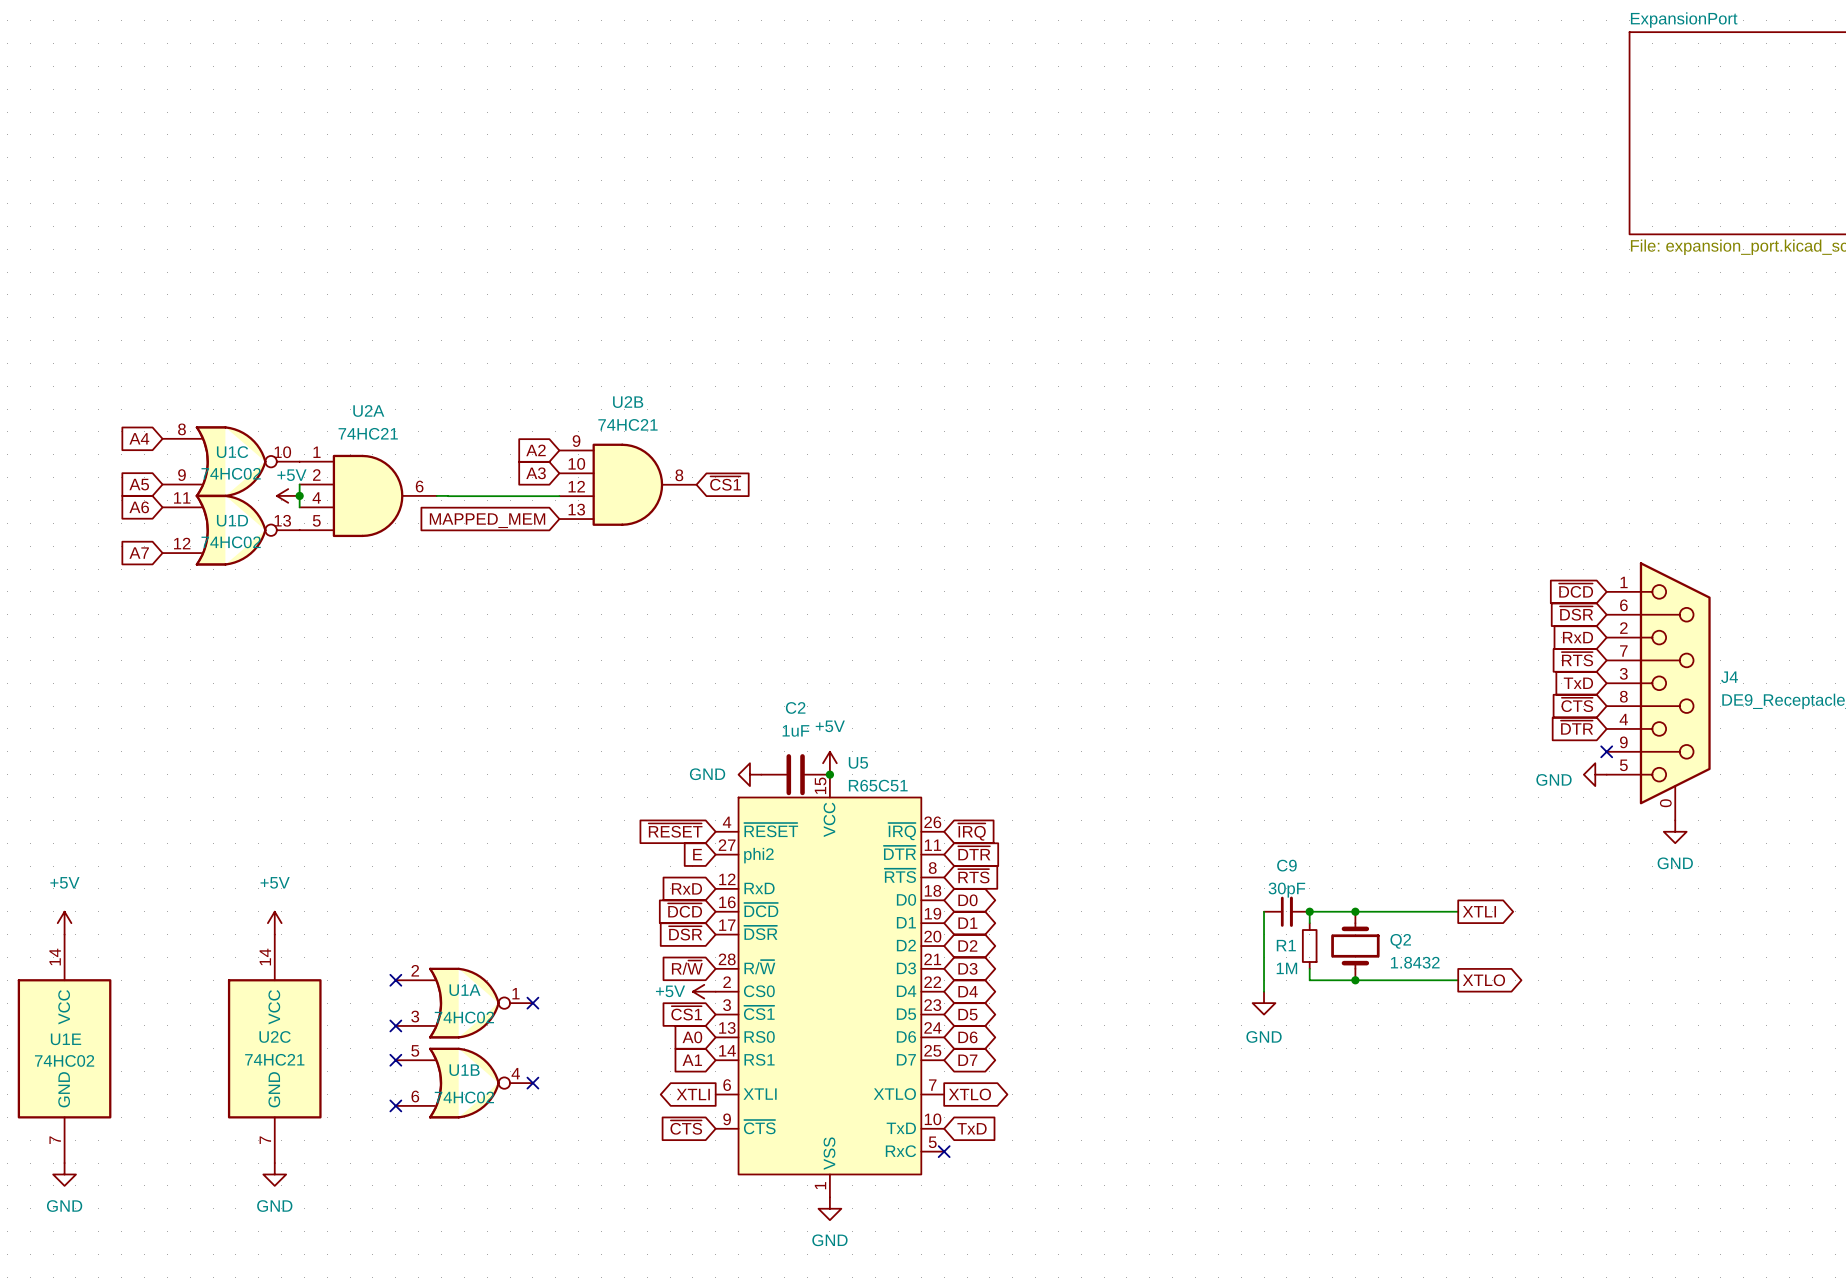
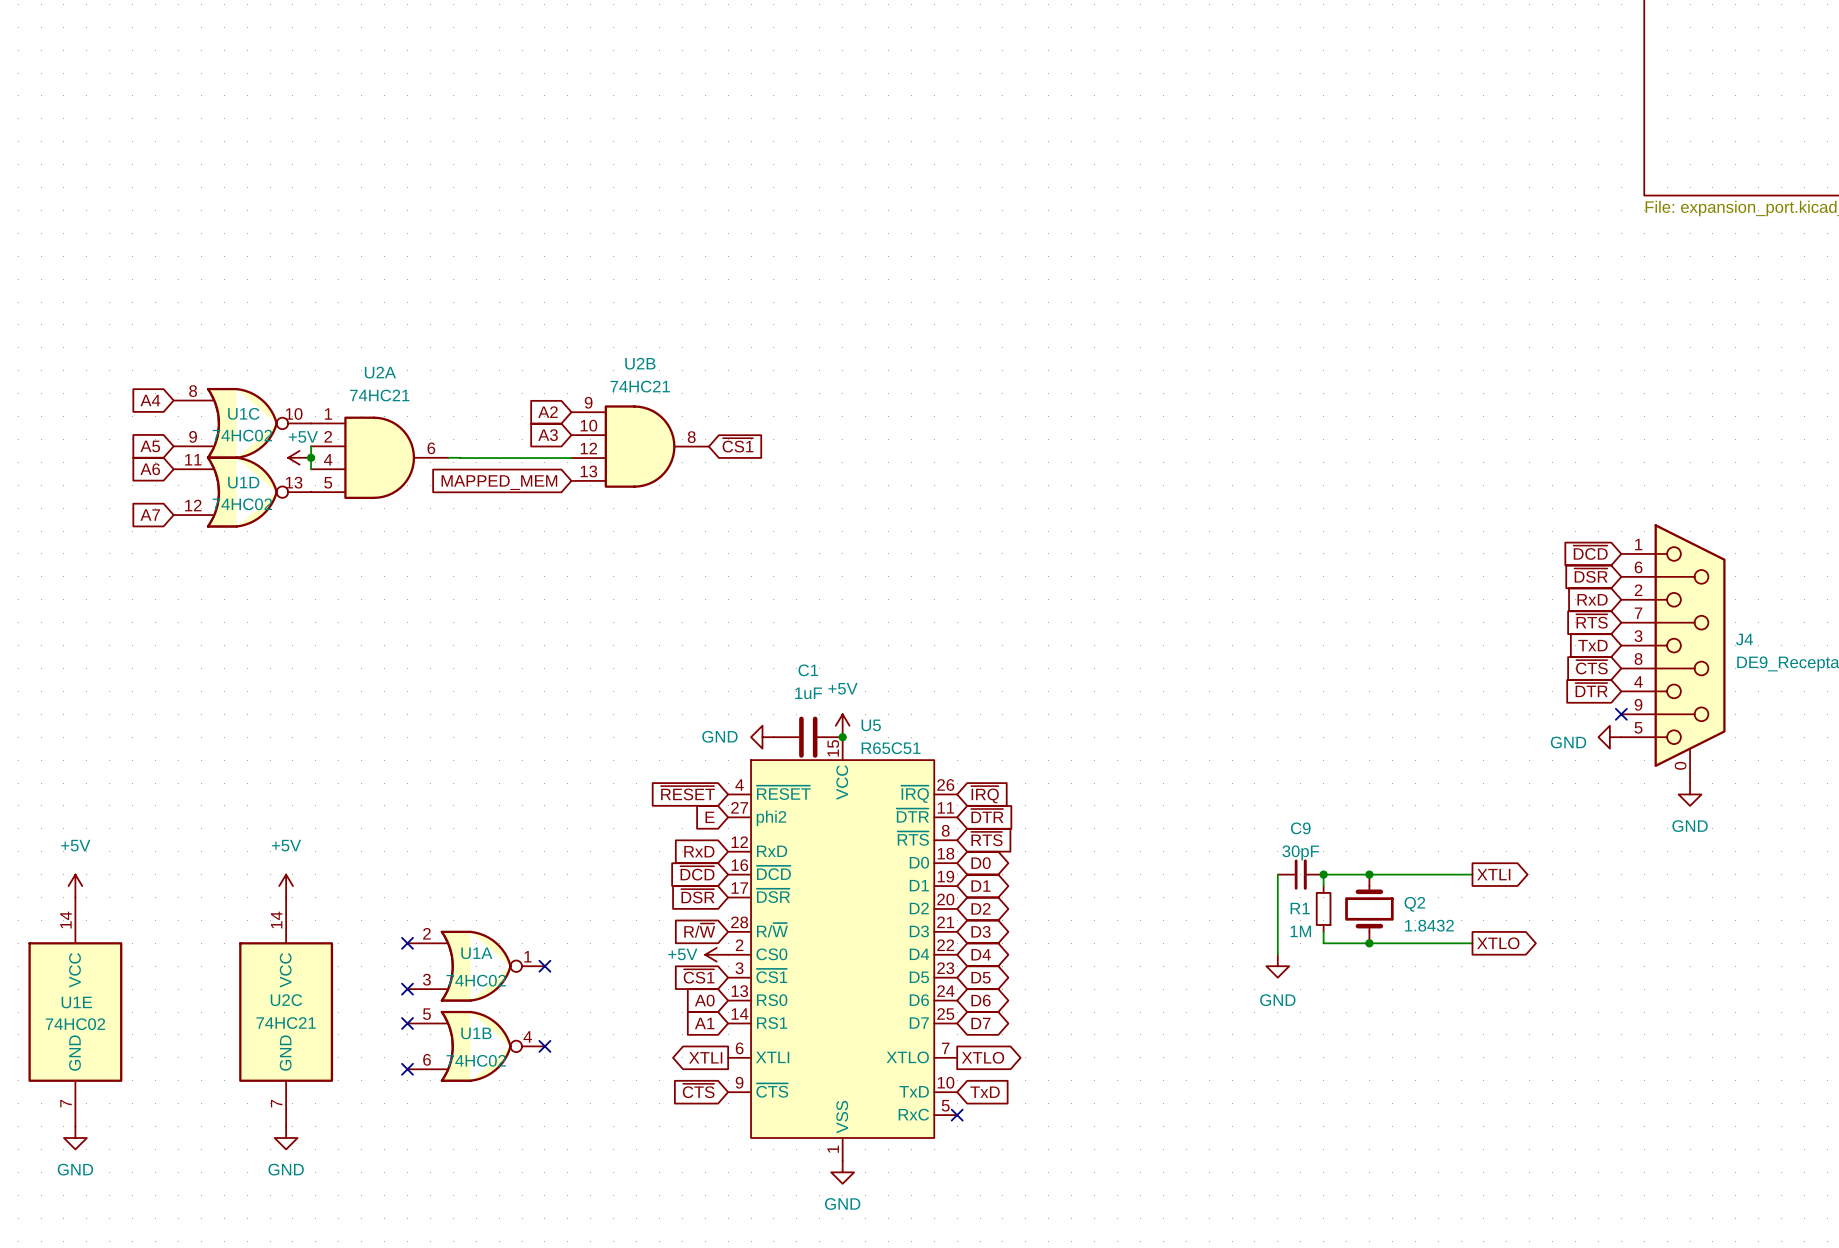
C2 name: C2 (795, 707) -> C1 (808, 670)

